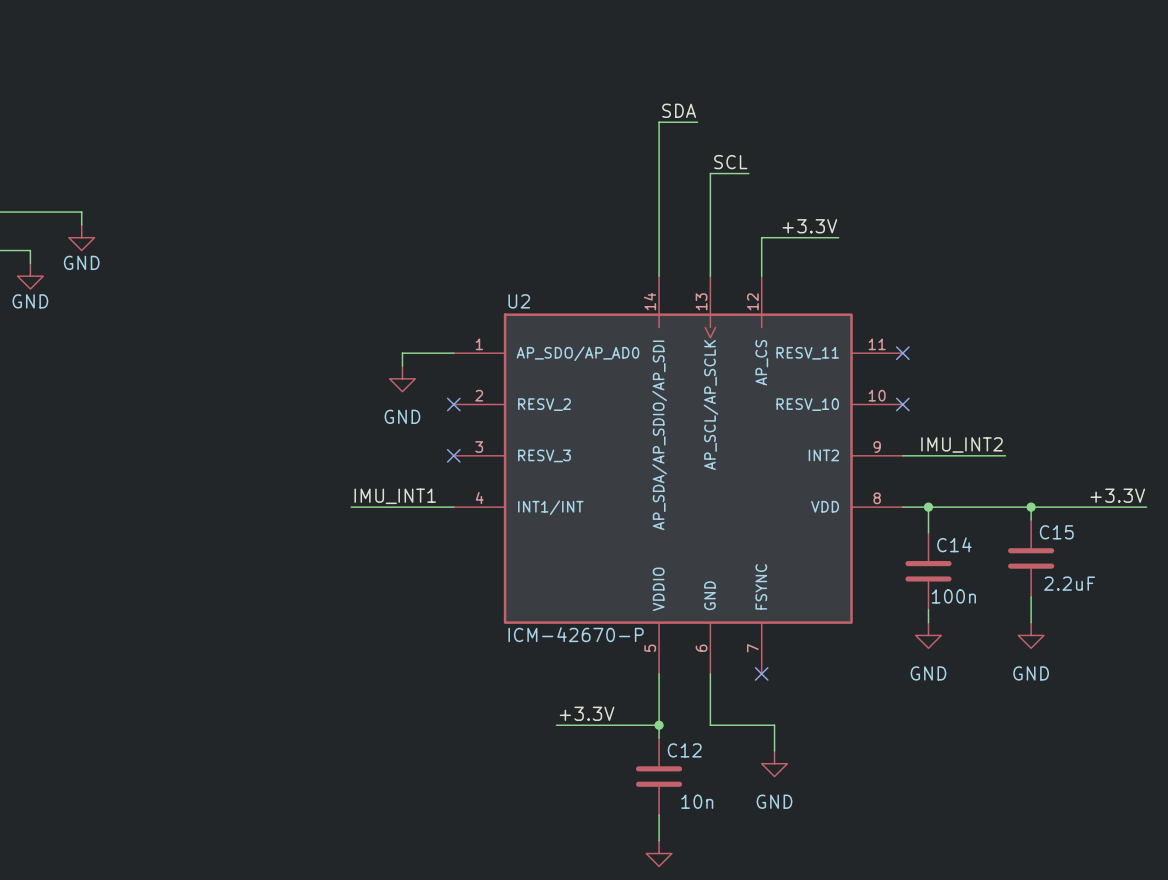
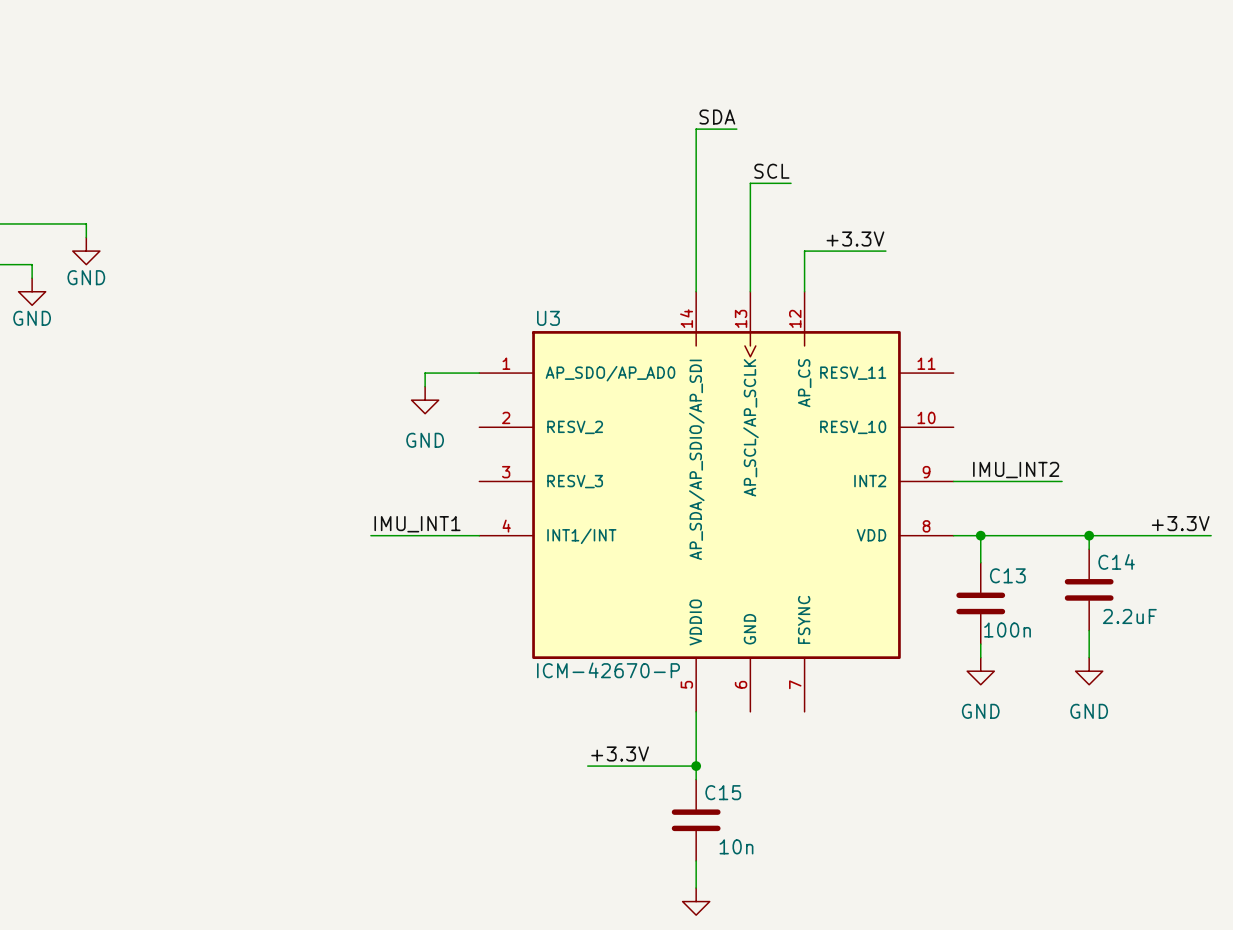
U2 name: U2 (519, 301) -> U3 (548, 318)
no-connect mark: (902, 353) -> none
no-connect mark: (453, 404) -> none
no-connect mark: (902, 404) -> none
no-connect mark: (453, 455) -> none
C15 name: C15 (1056, 532) -> C14 (1116, 561)
C14 name: C14 (954, 544) -> C13 (1007, 575)
wire: (710, 673) (710, 725) (774, 725) (774, 750) -> none
no-connect mark: (761, 673) -> none
C12 name: C12 (684, 750) -> C15 (723, 792)
power symbol: GND (774, 763) -> none

